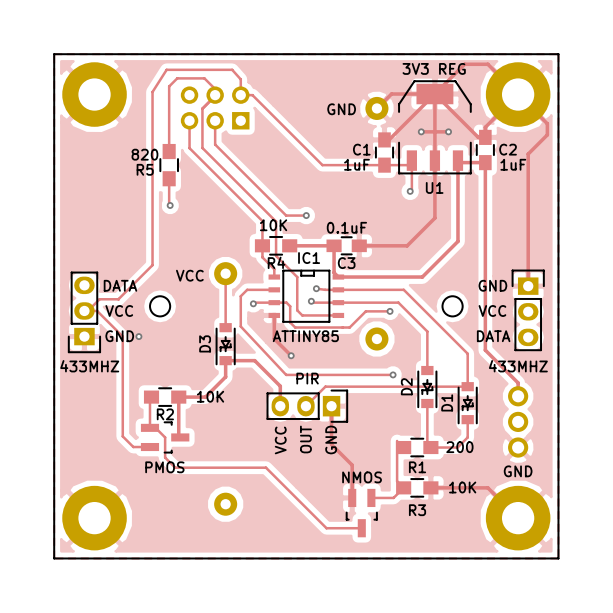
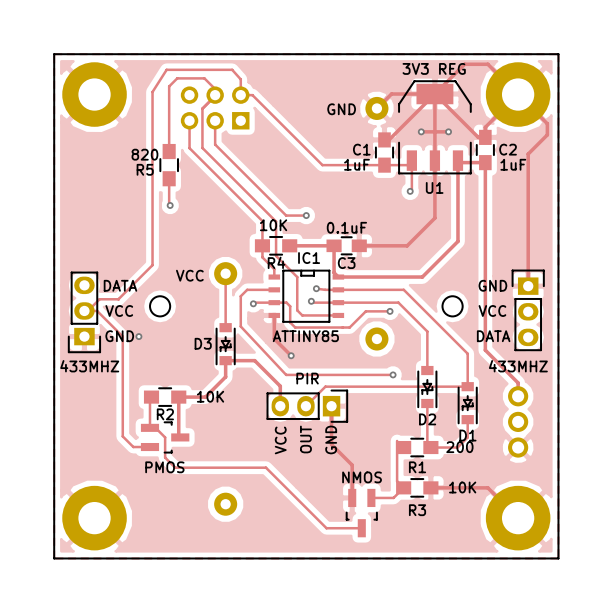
D3 name rotation: 0° (205, 343) -> 90° clockwise (203, 343)
D2 name rotation: 0° (406, 386) -> 90° clockwise (427, 419)
D2 name position: D2 (406, 386) -> D2 (427, 419)
D1 name rotation: 0° (447, 402) -> 90° clockwise (467, 435)
D1 name position: D1 (447, 402) -> D1 (467, 435)
text: GND (518, 471) -> none

